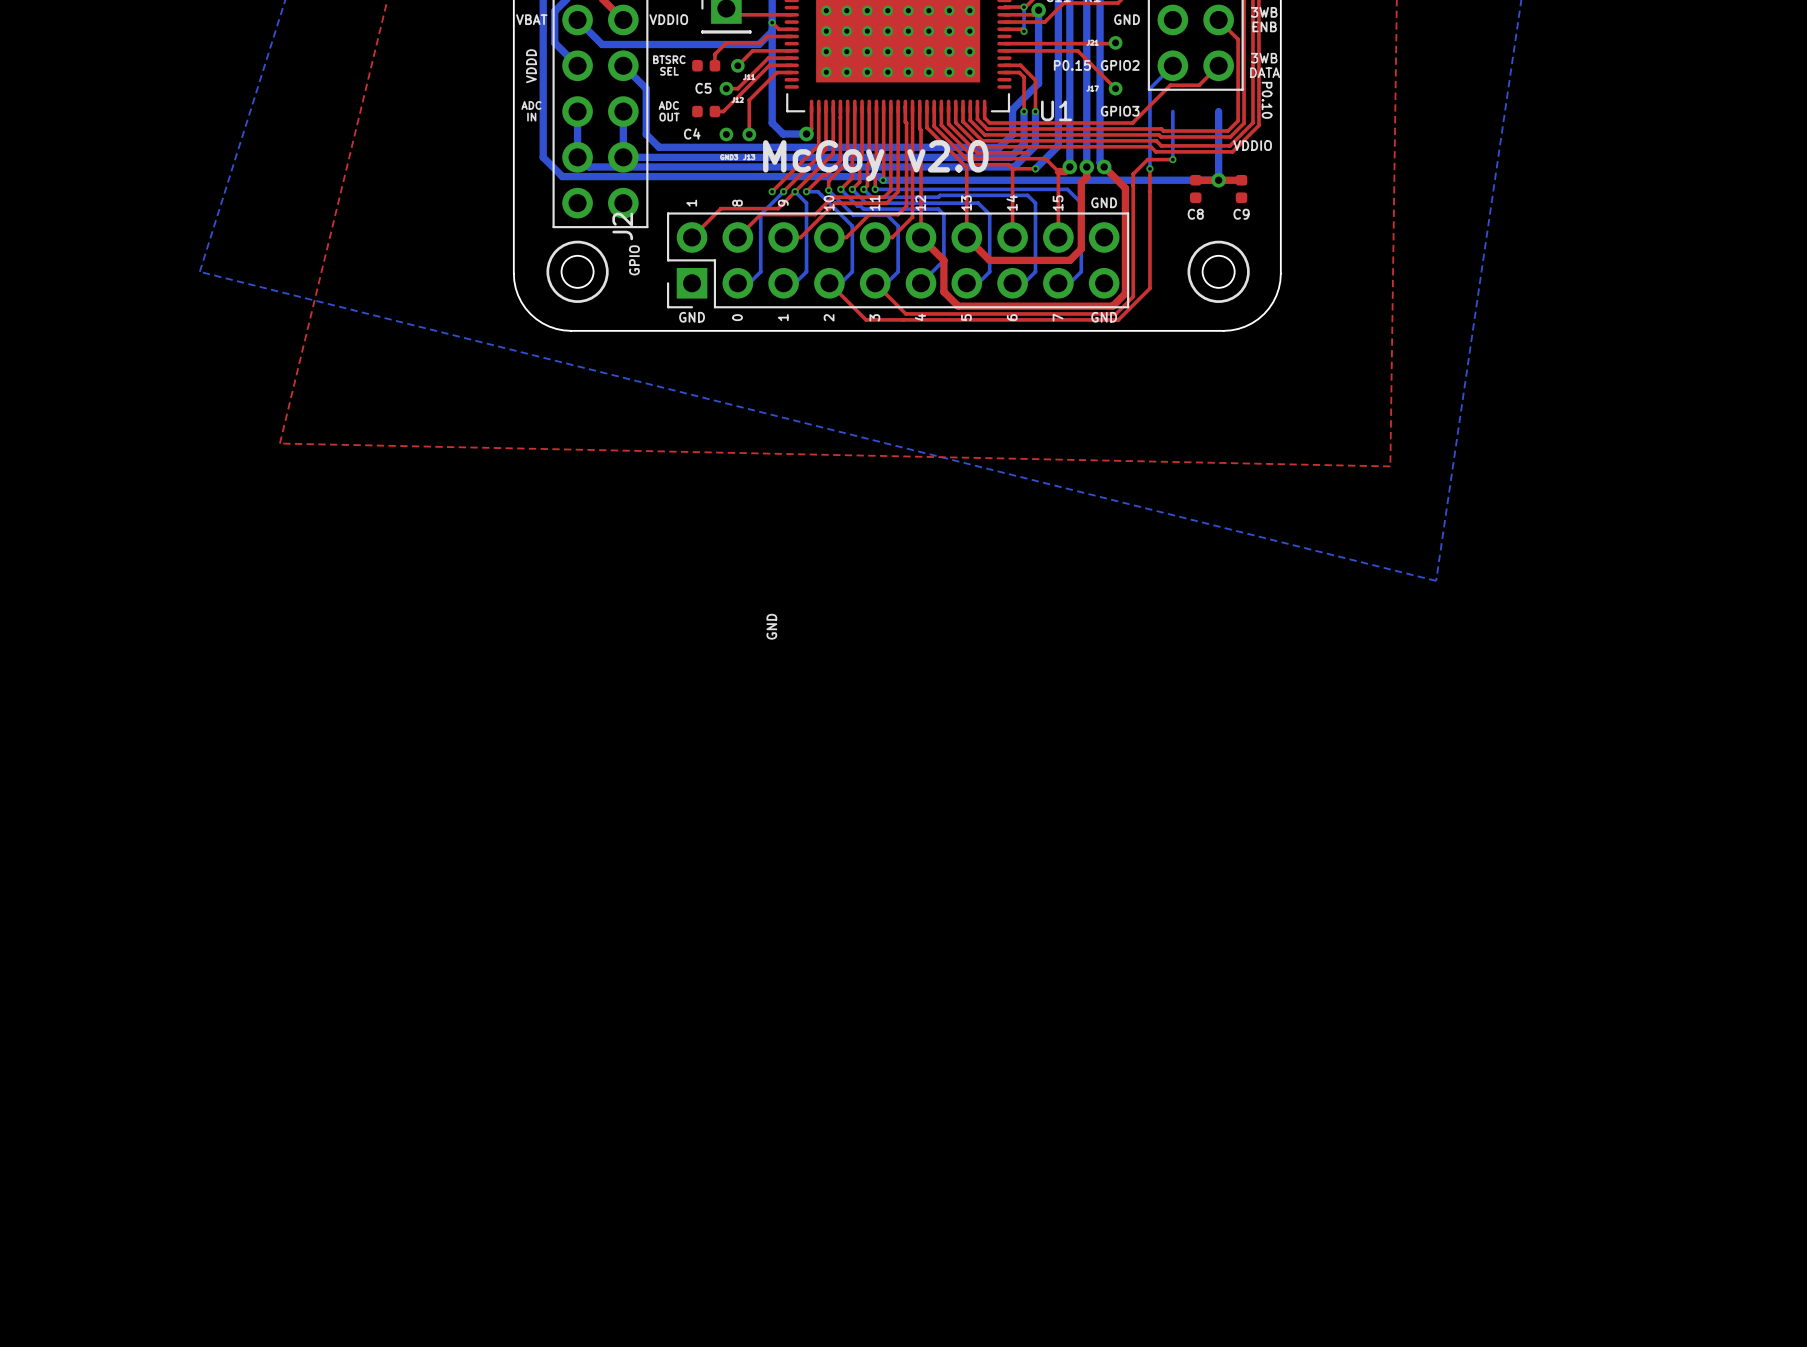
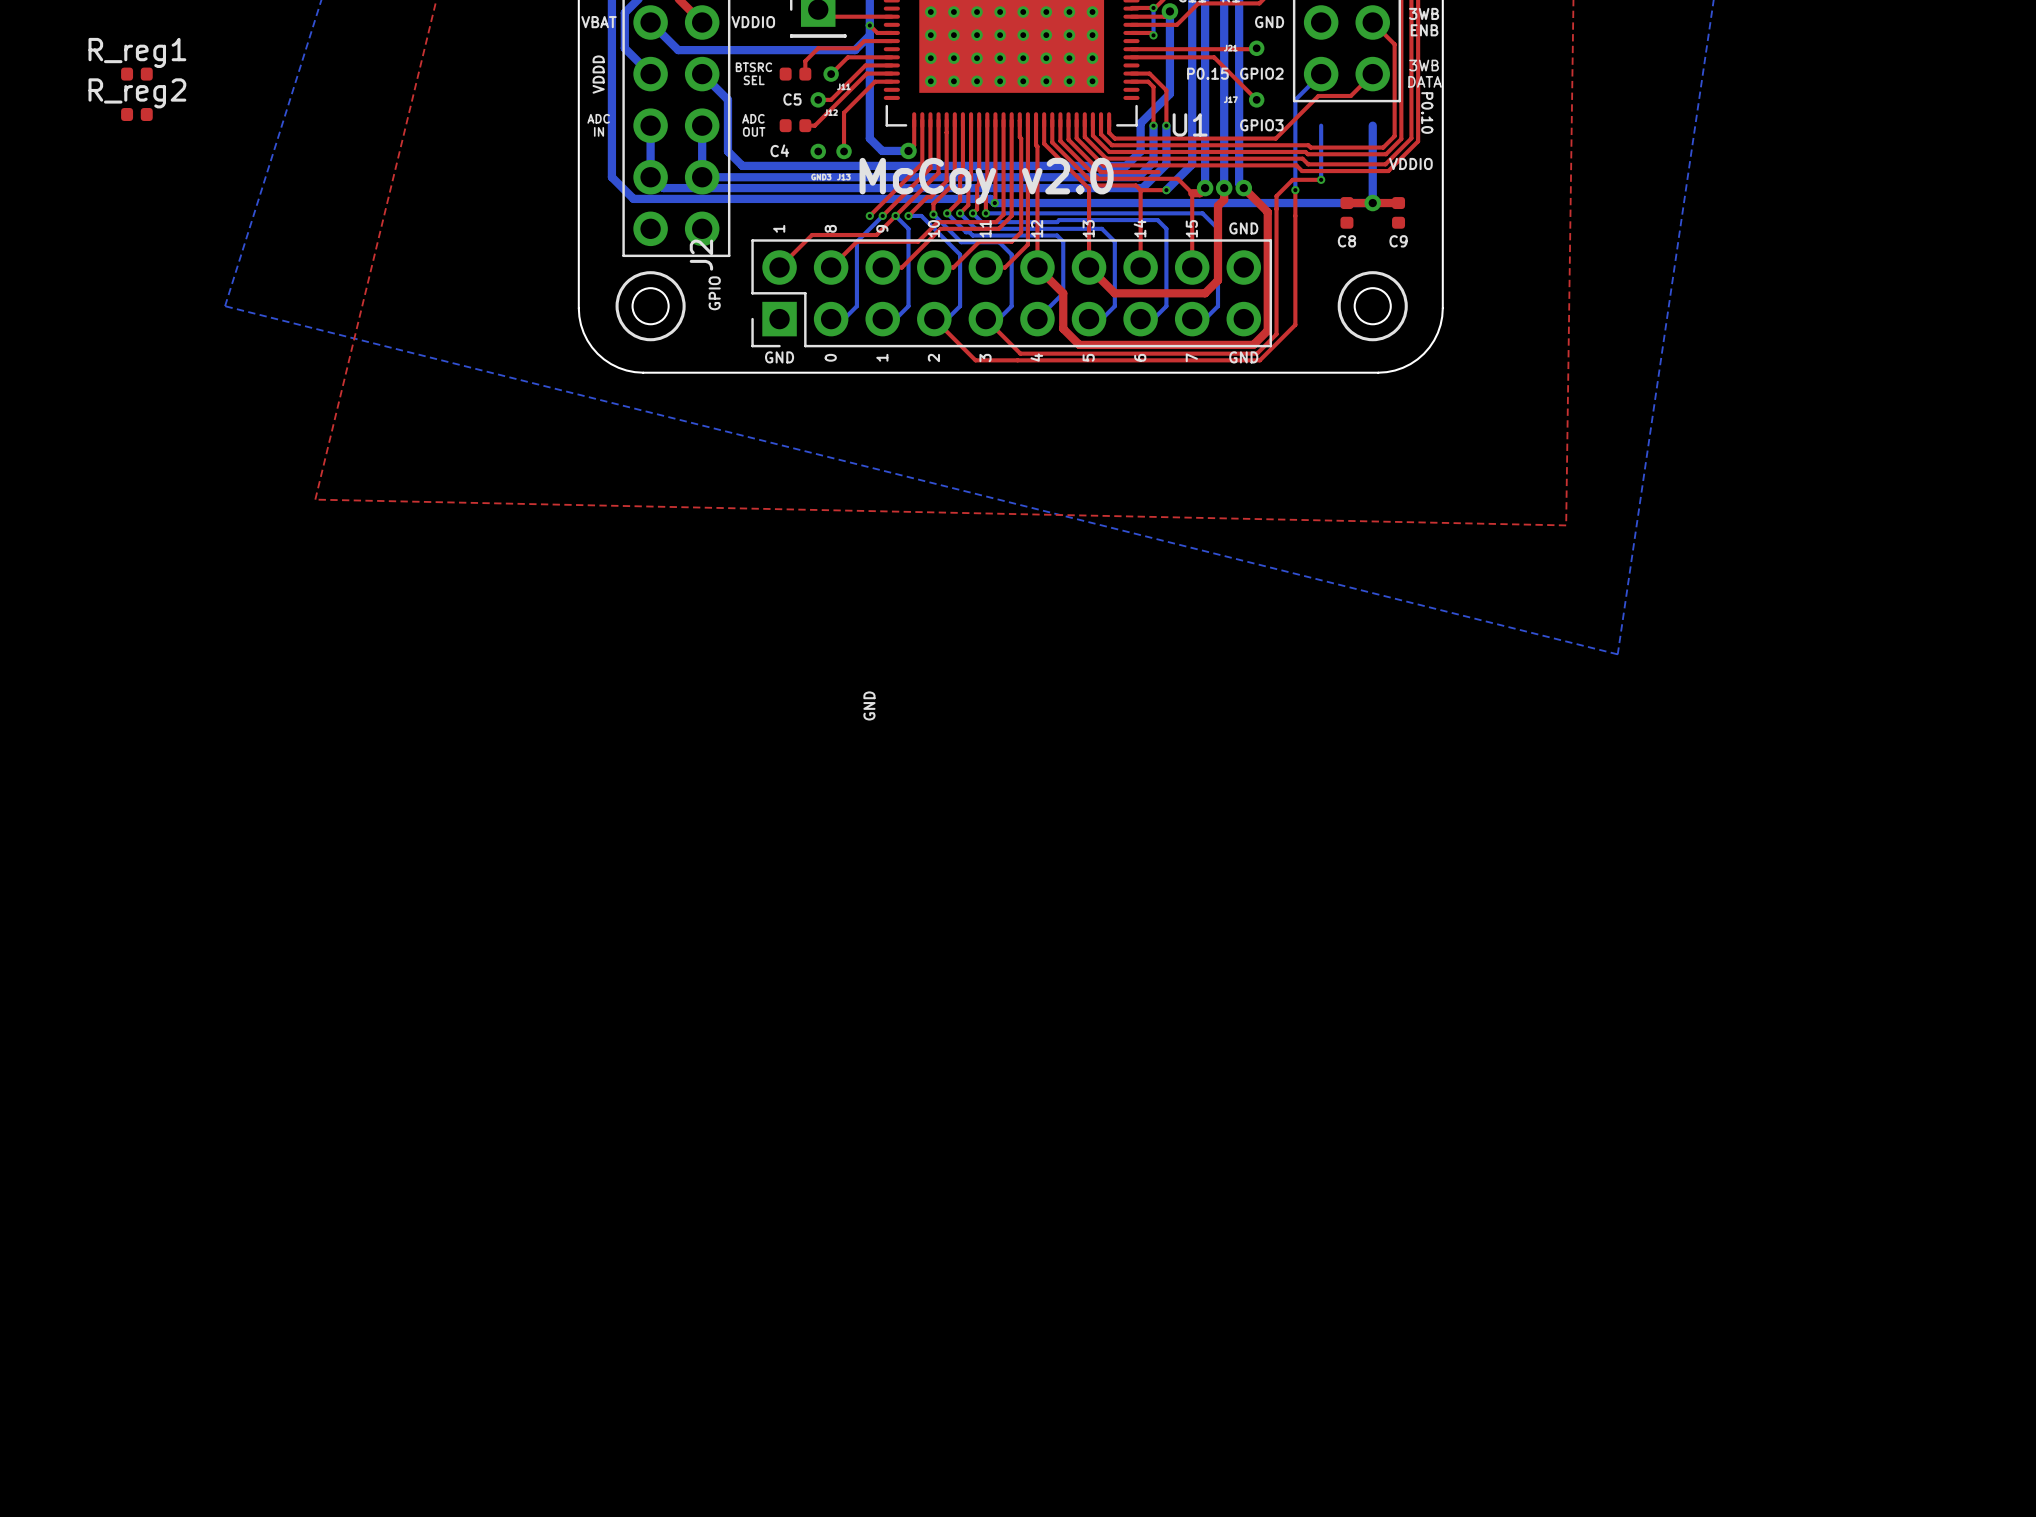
R_reg1: none -> (136, 74)
R_reg2: none -> (136, 114)

